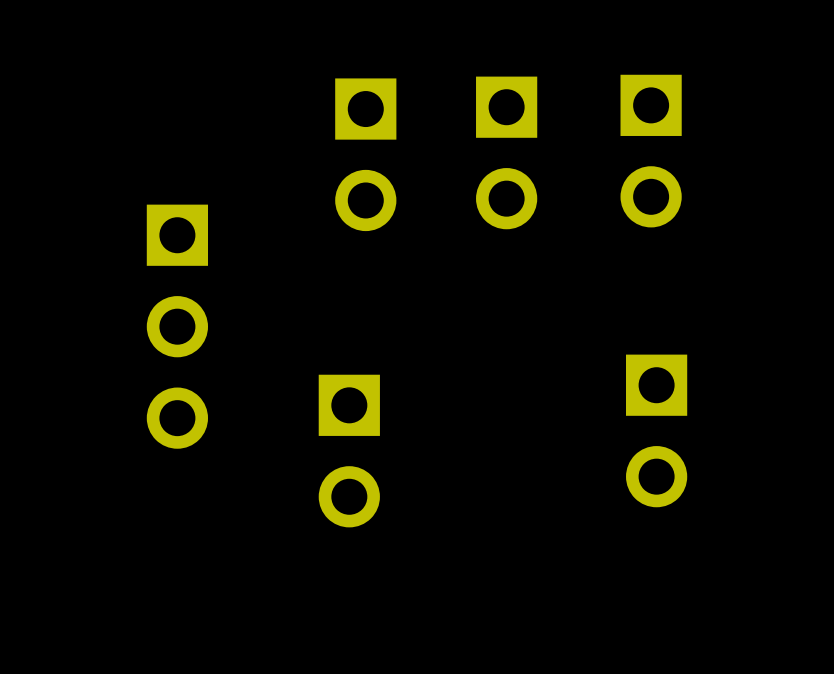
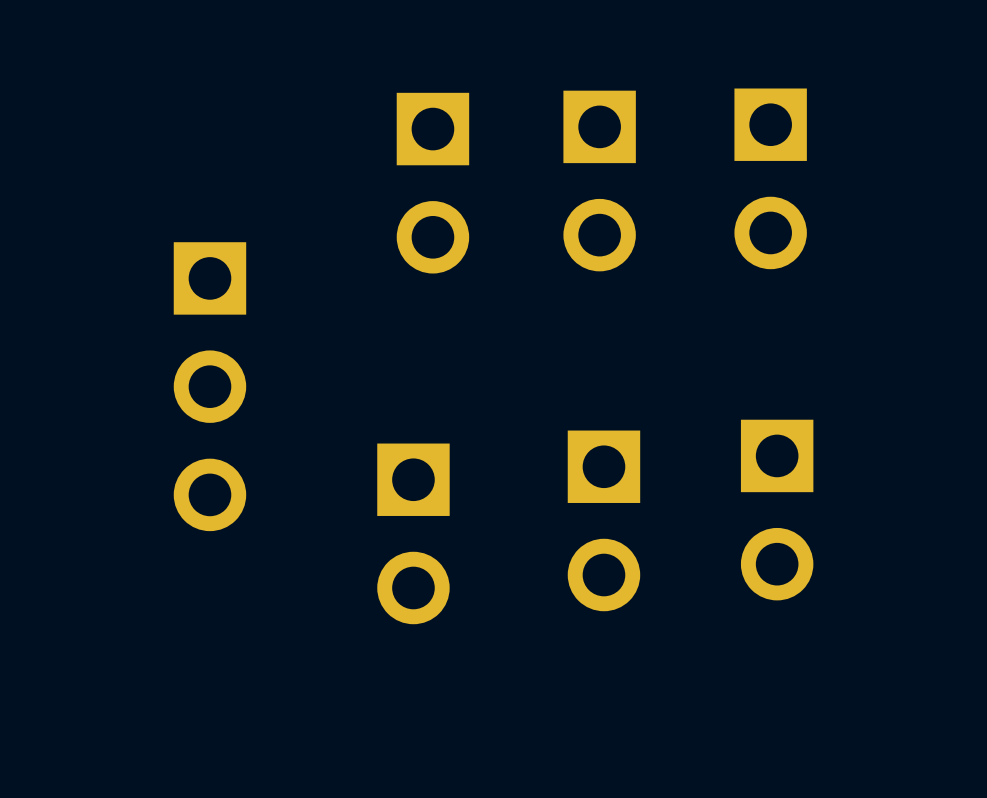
part: none -> (603, 520)

